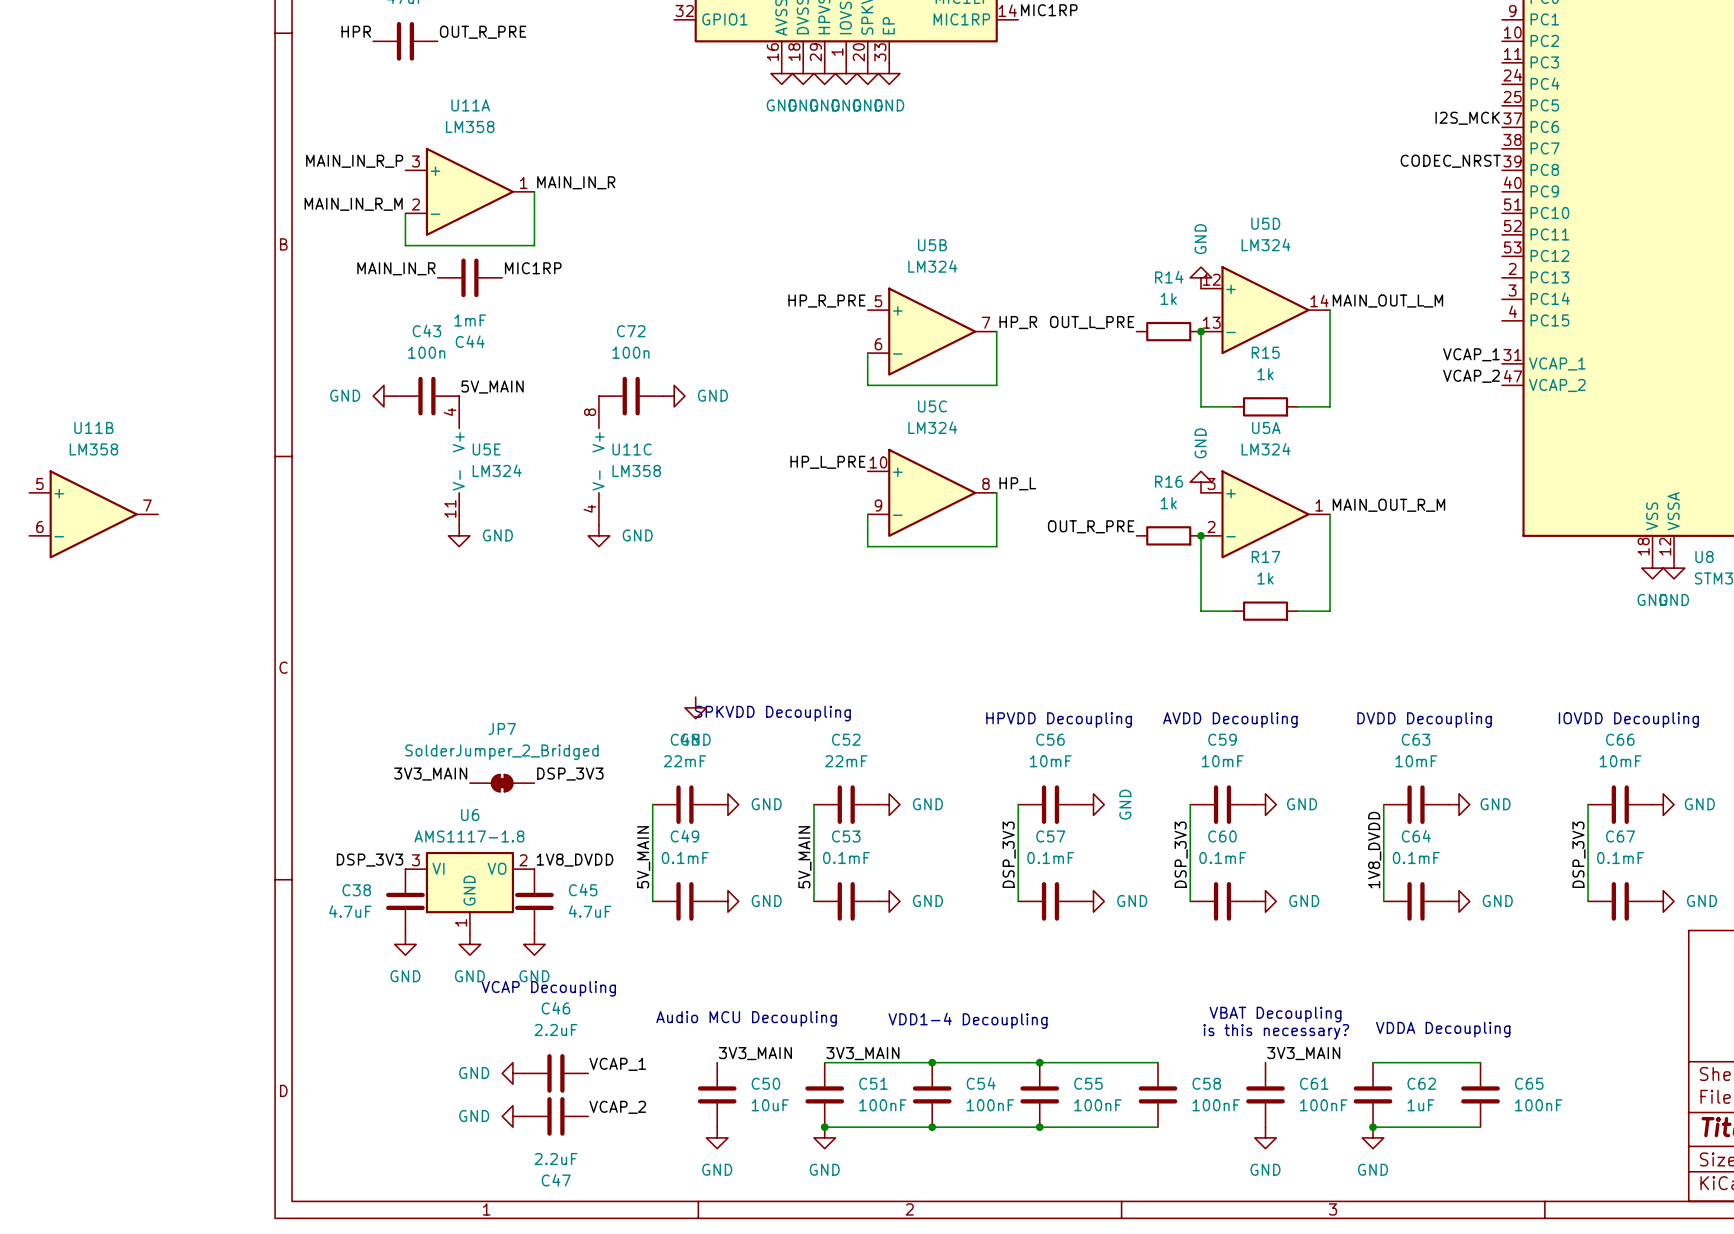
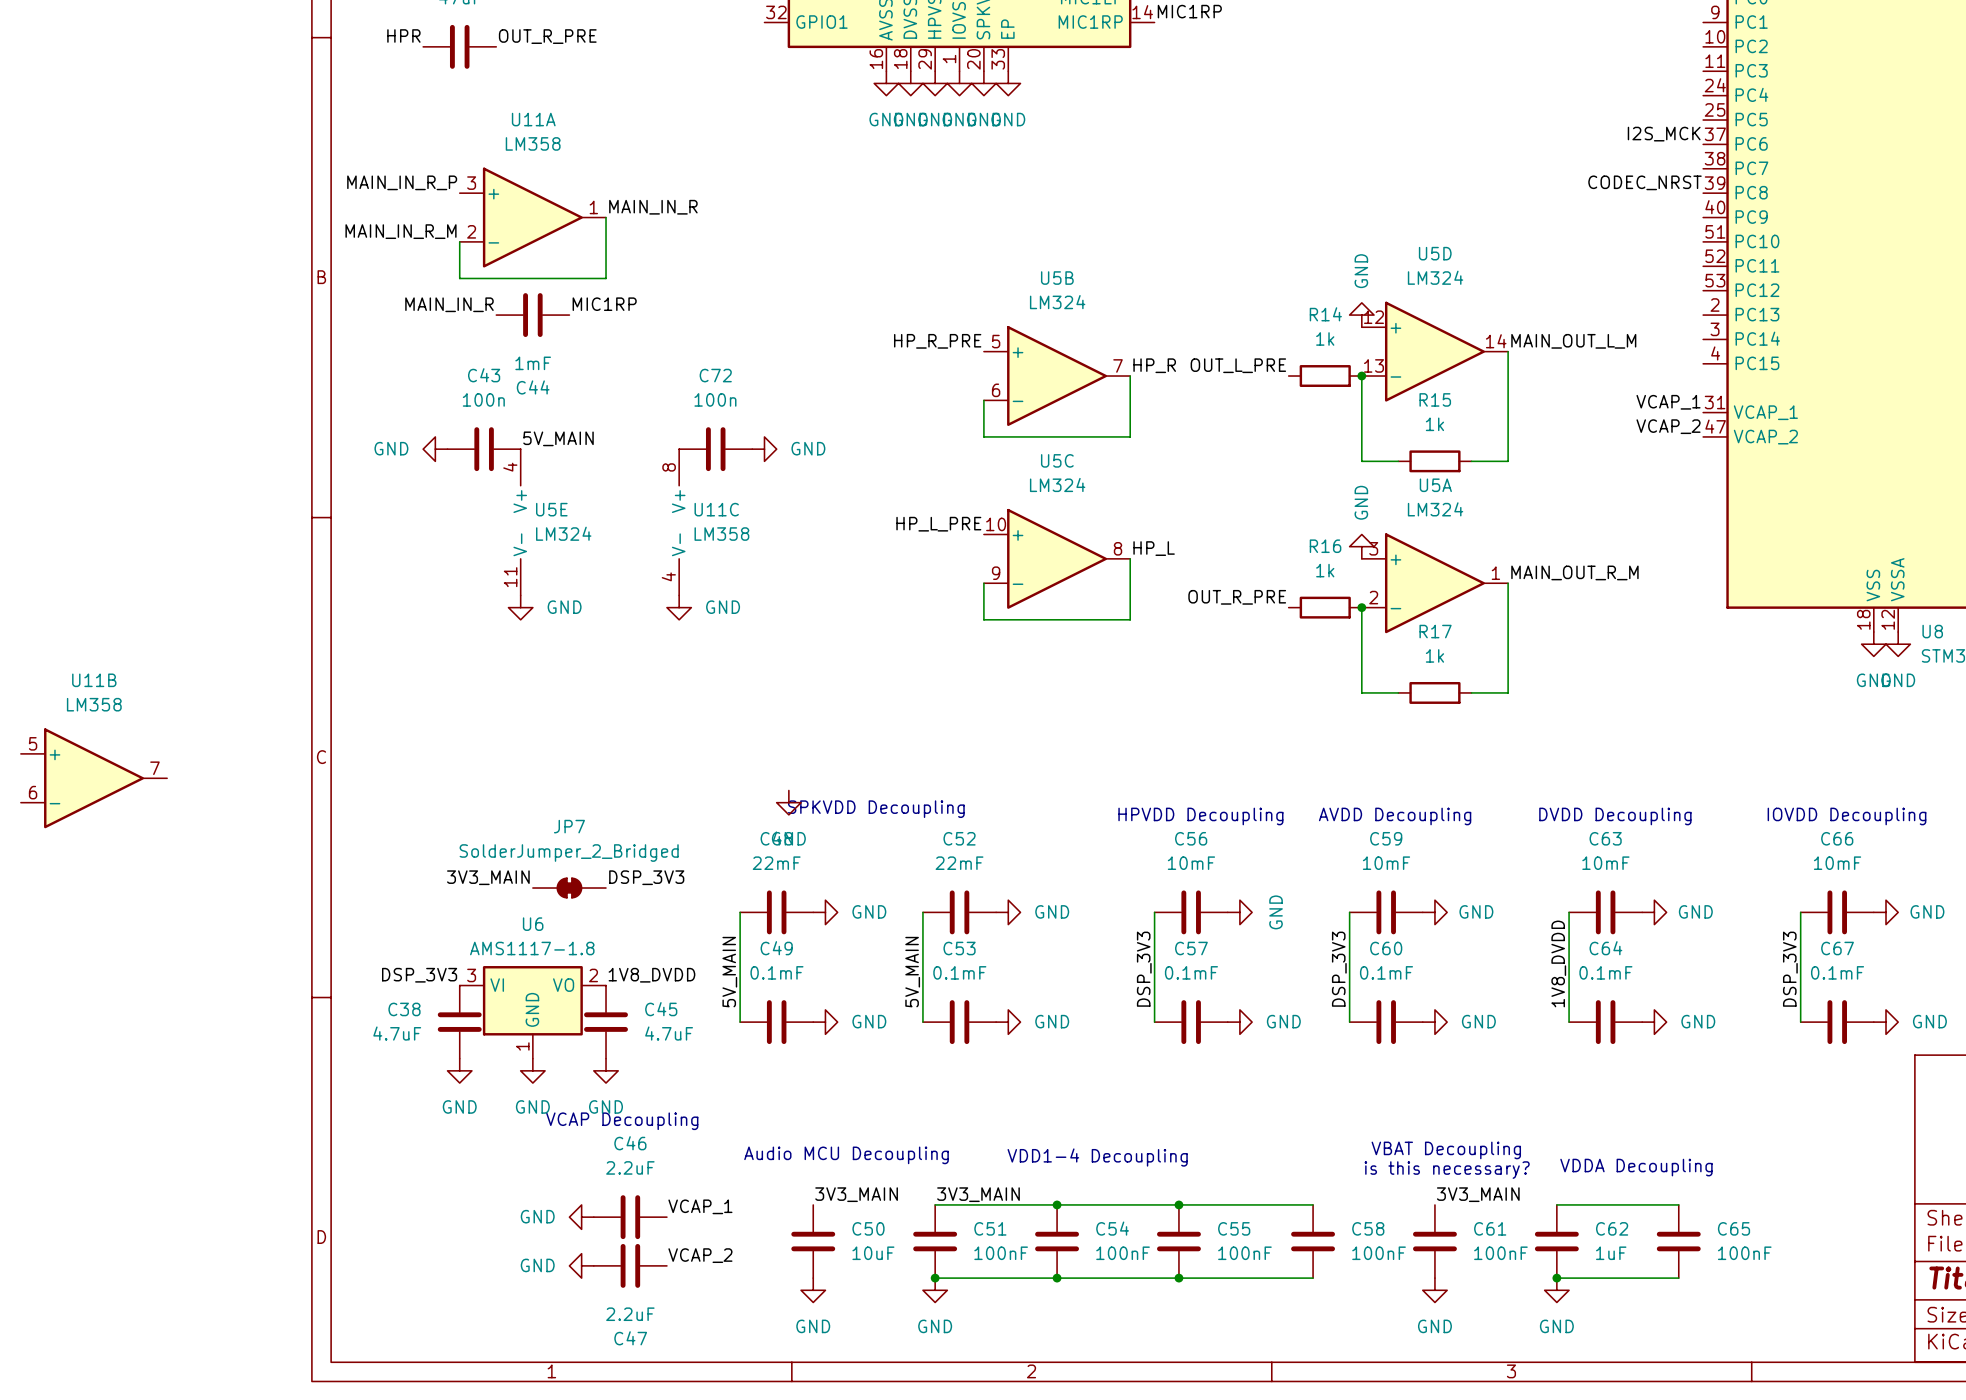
U11B position: (93, 514) -> (94, 778)

